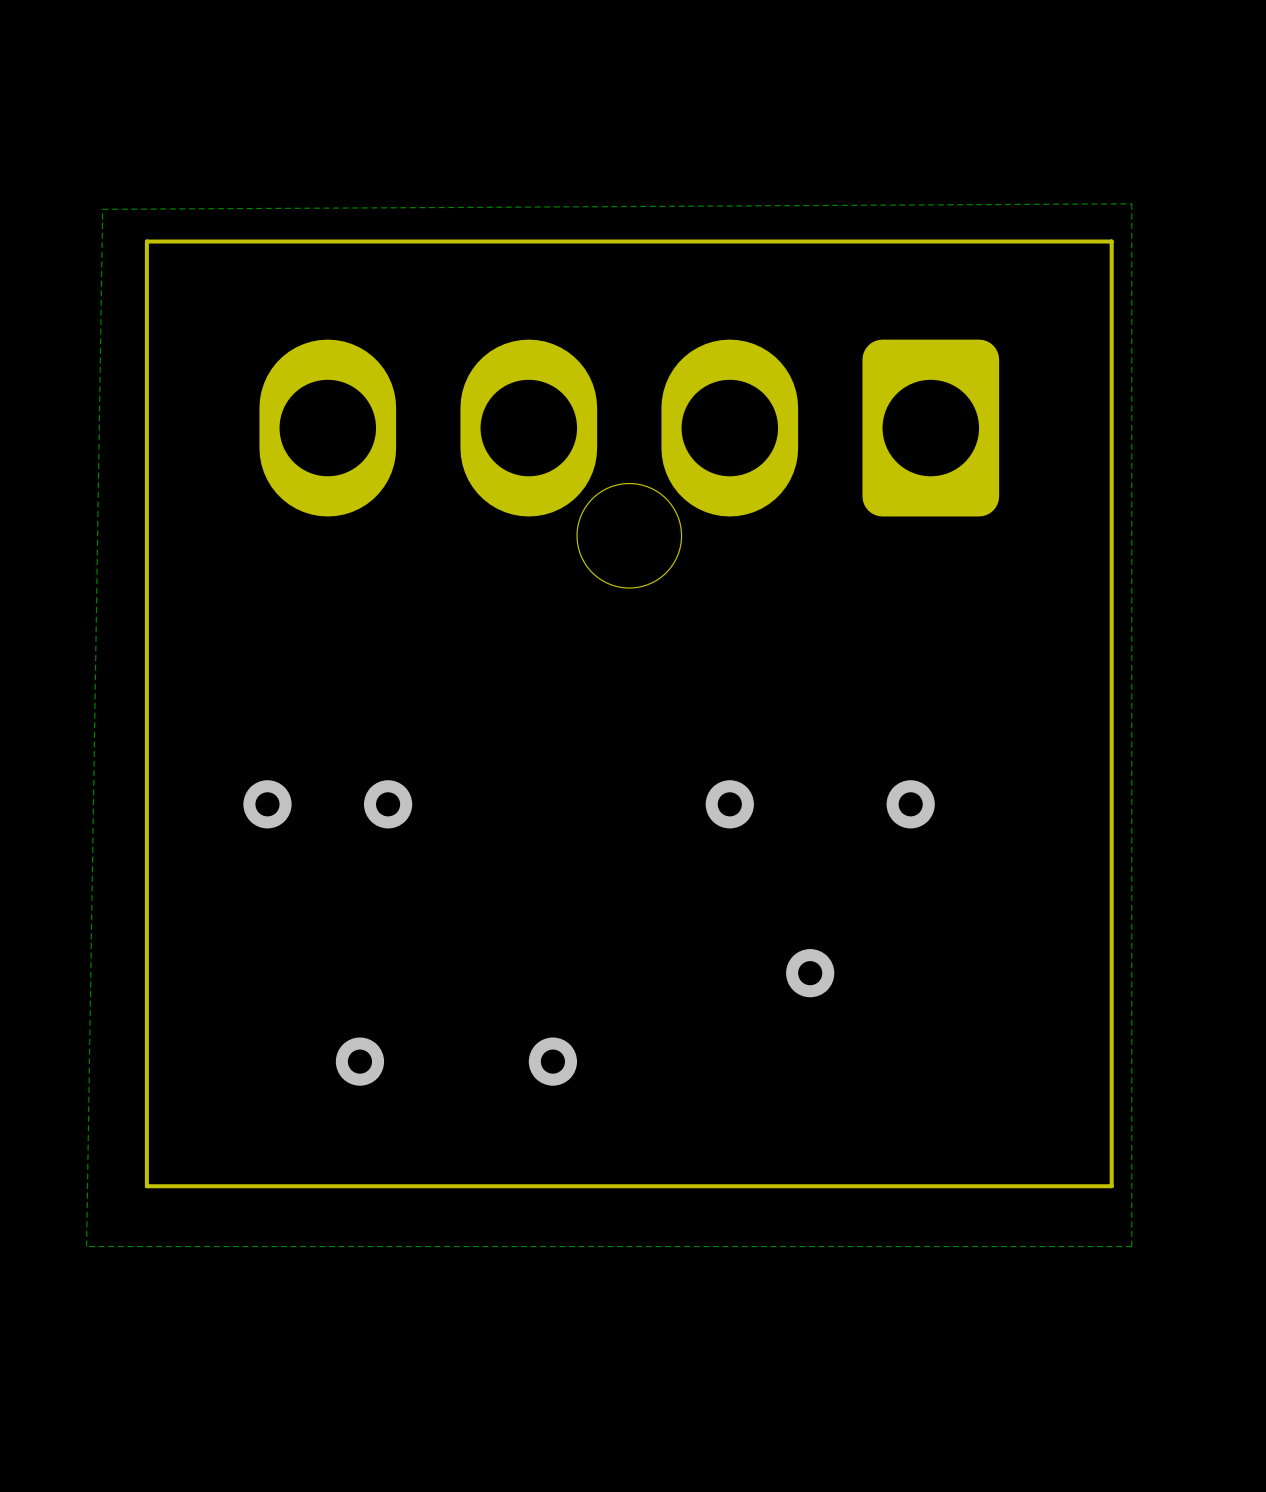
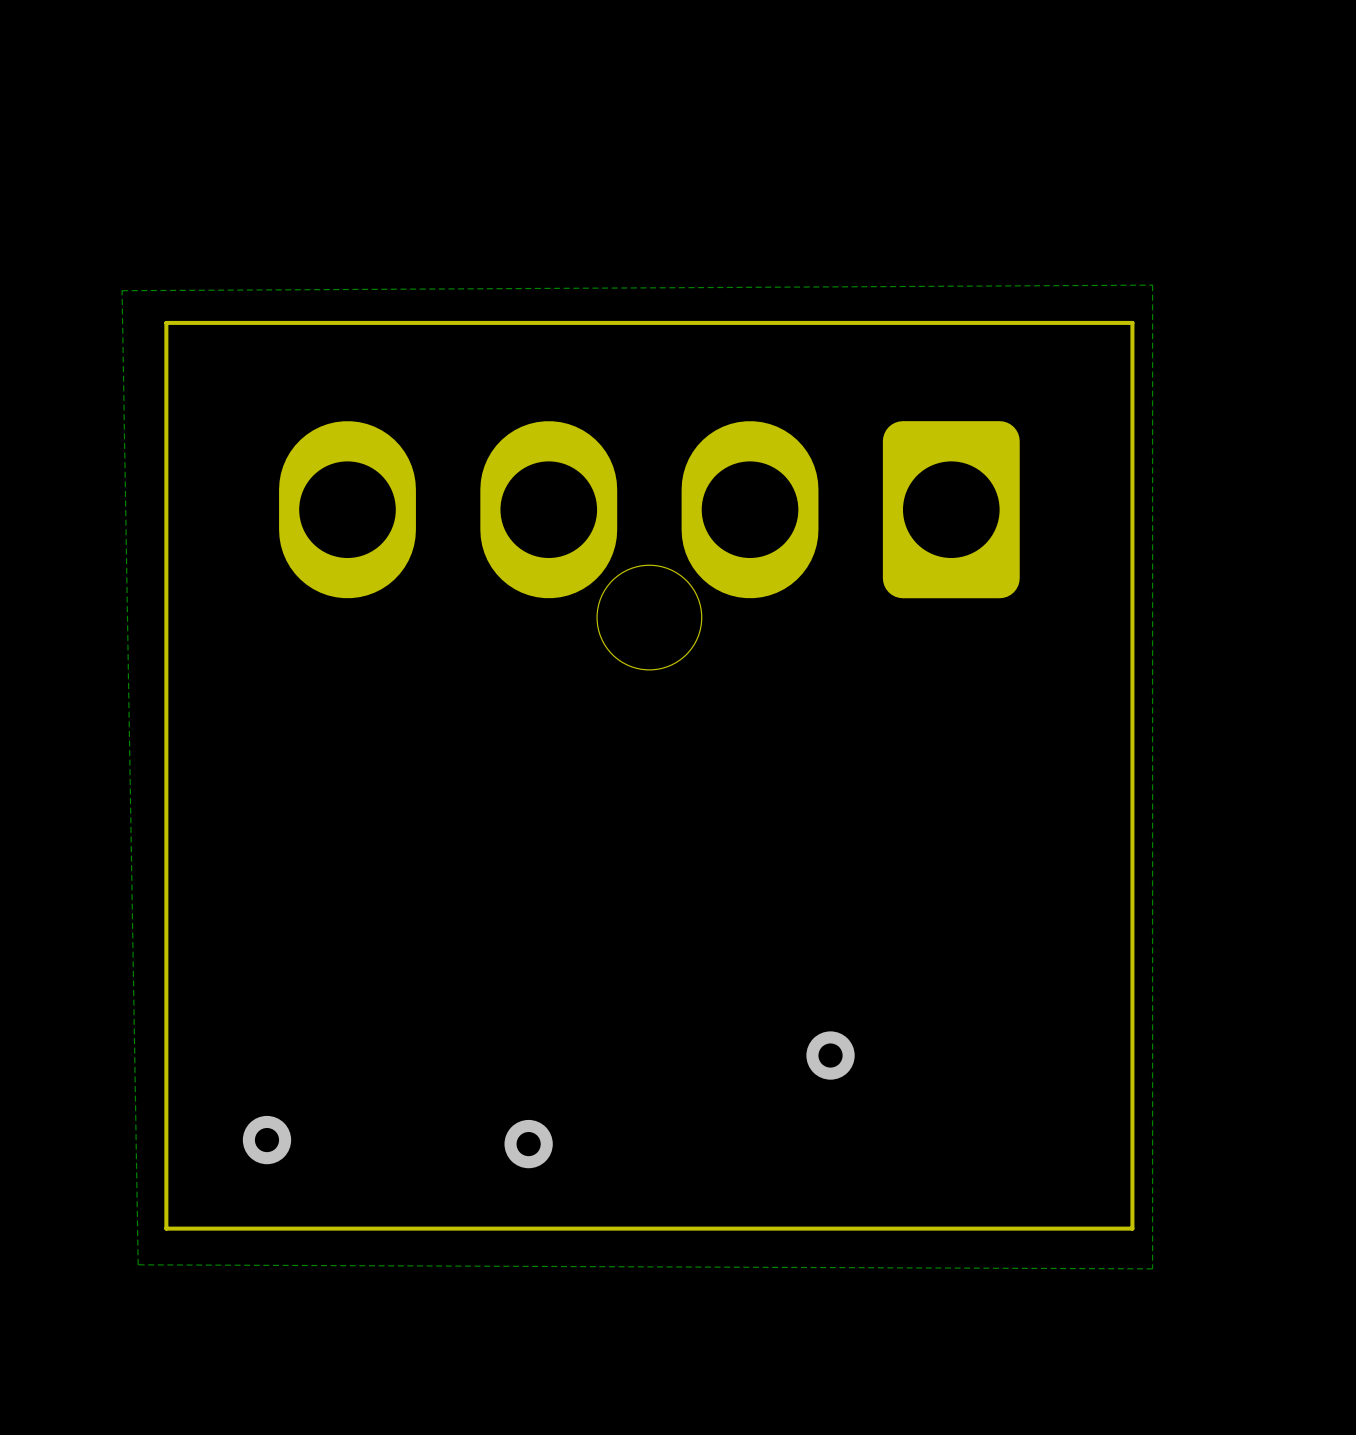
zone outline: (102, 209) (86, 1246) (1131, 1246) (1131, 1186) -> (122, 290) (138, 1264) (1152, 1268)
via: (267, 804) -> none
via: (388, 804) -> none
via: (729, 804) -> none
via: (910, 804) -> none
via: none -> (266, 1140)
via: (359, 1061) -> none
via position: (552, 1061) -> (528, 1144)
board edge: (1111, 1146) (1111, 1186) (146, 1186) (146, 1146) -> (1132, 1228) (166, 1228)

